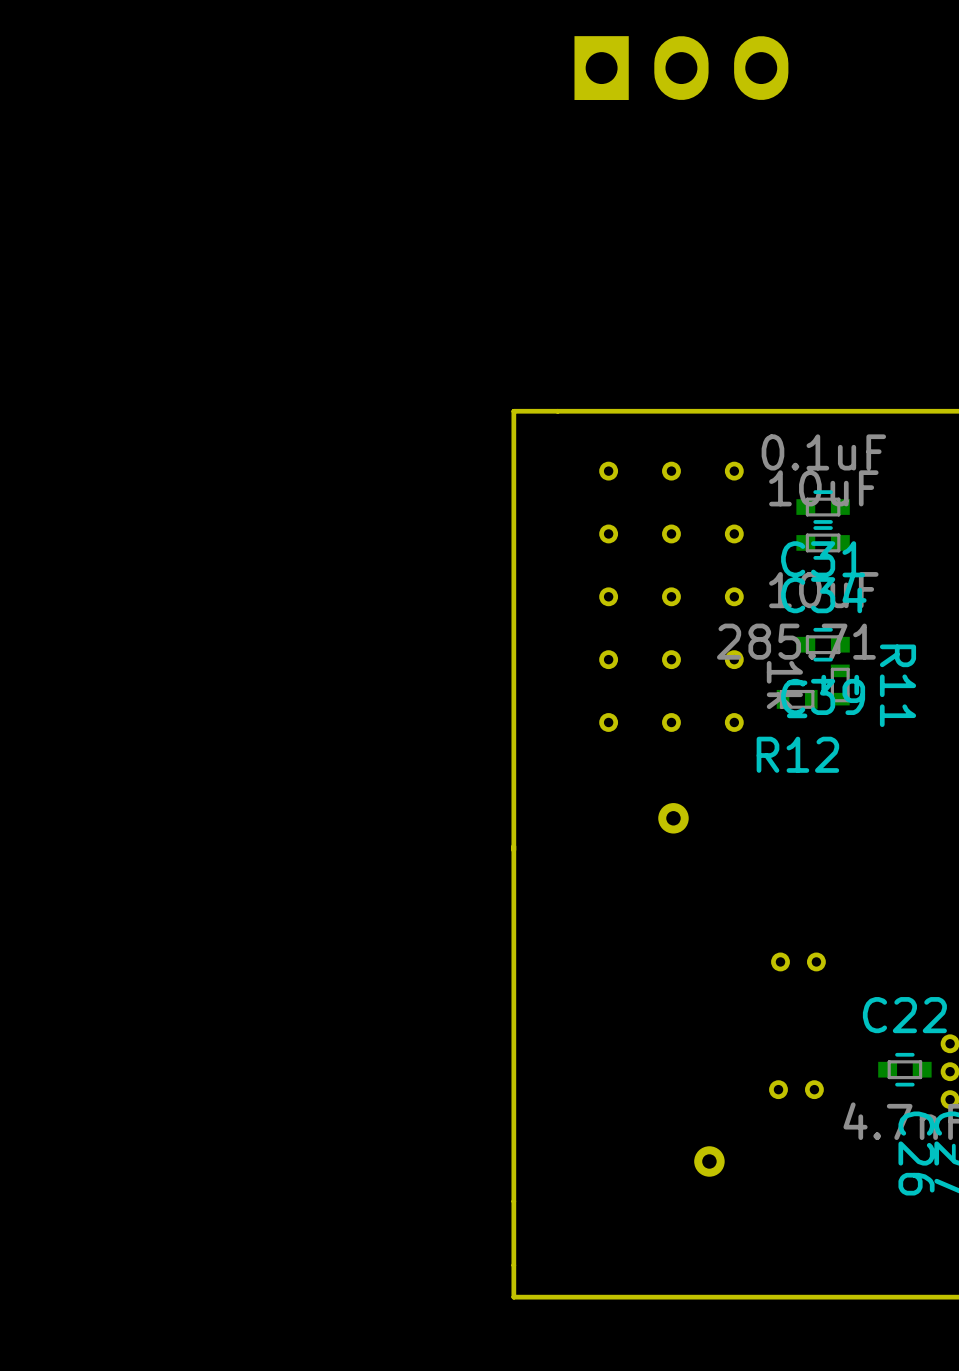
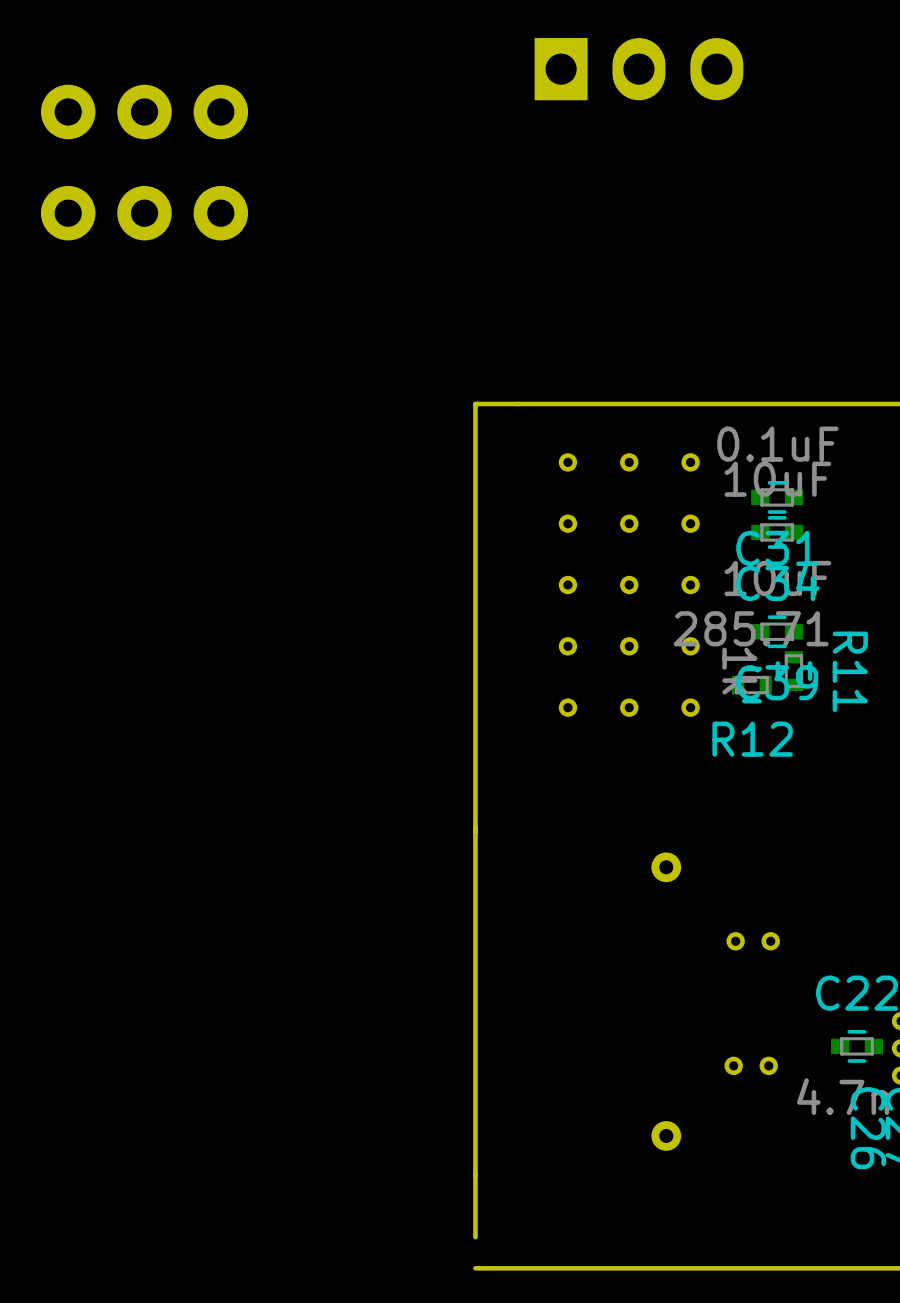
part: none -> (144, 162)
part position: (673, 818) -> (666, 867)
board edge: (513, 1265) (513, 1297) -> none

